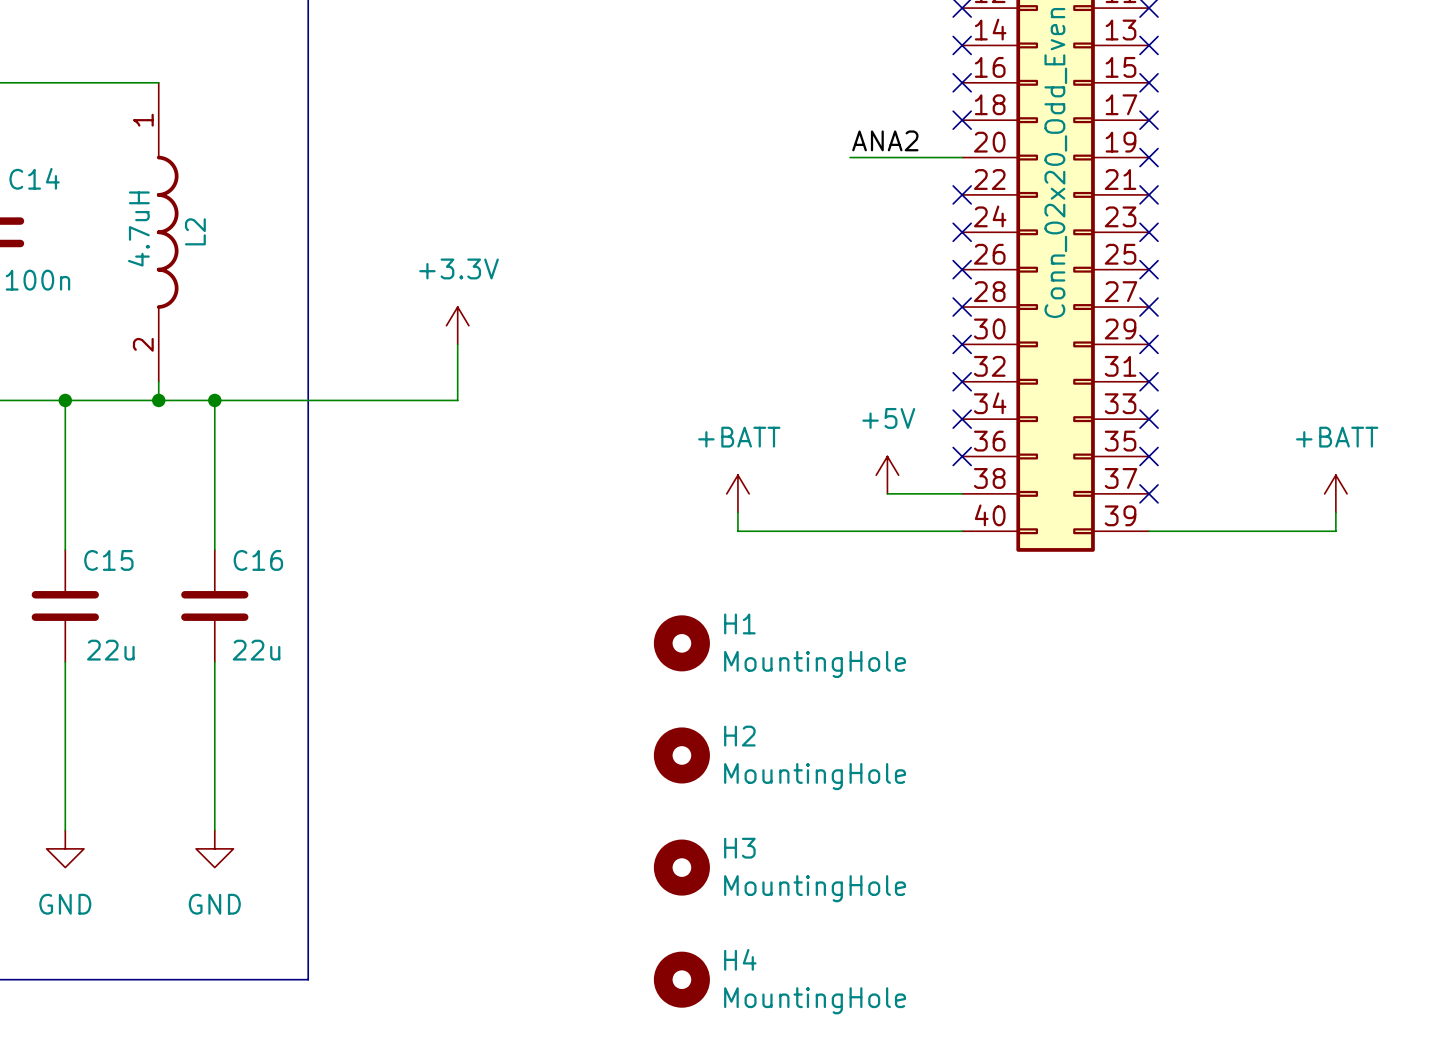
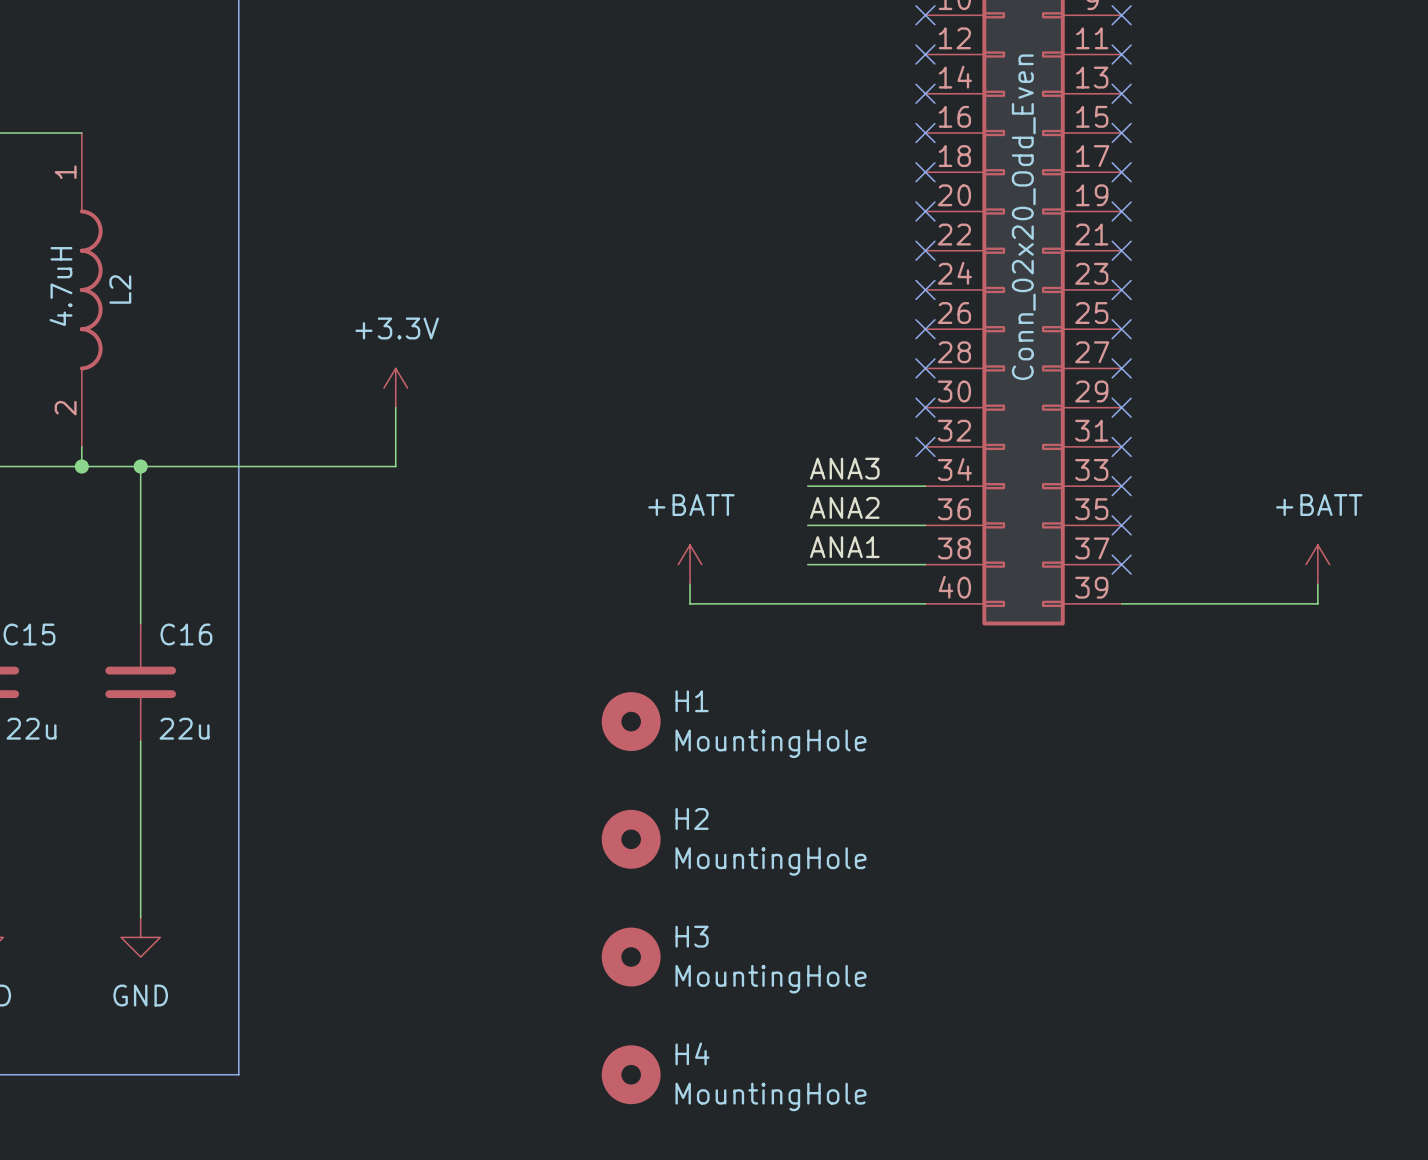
label position: ANA2 (885, 140) -> ANA2 (844, 507)
wire: (850, 157) (962, 157) -> (807, 486) (925, 486)
no-connect mark: none -> (925, 211)
label: none -> ANA3 (844, 468)
no-connect mark: (962, 419) -> none
wire: none -> (807, 525) (925, 525)
no-connect mark: (962, 456) -> none
power symbol: +5V (887, 475) -> none
label: none -> ANA1 (844, 547)
wire: none -> (807, 564) (846, 564)

